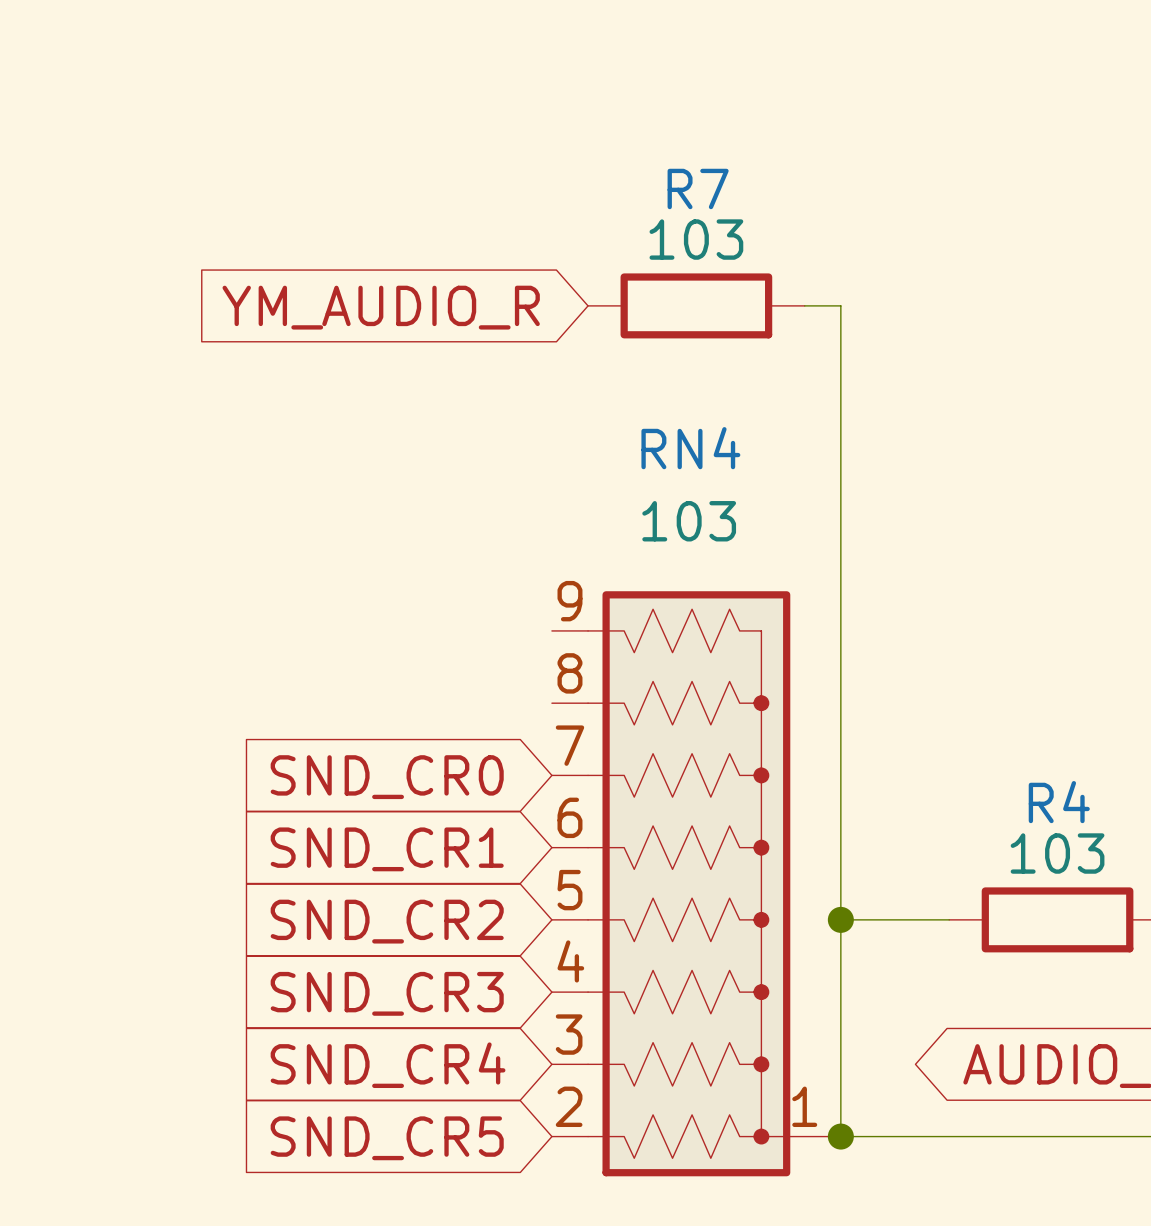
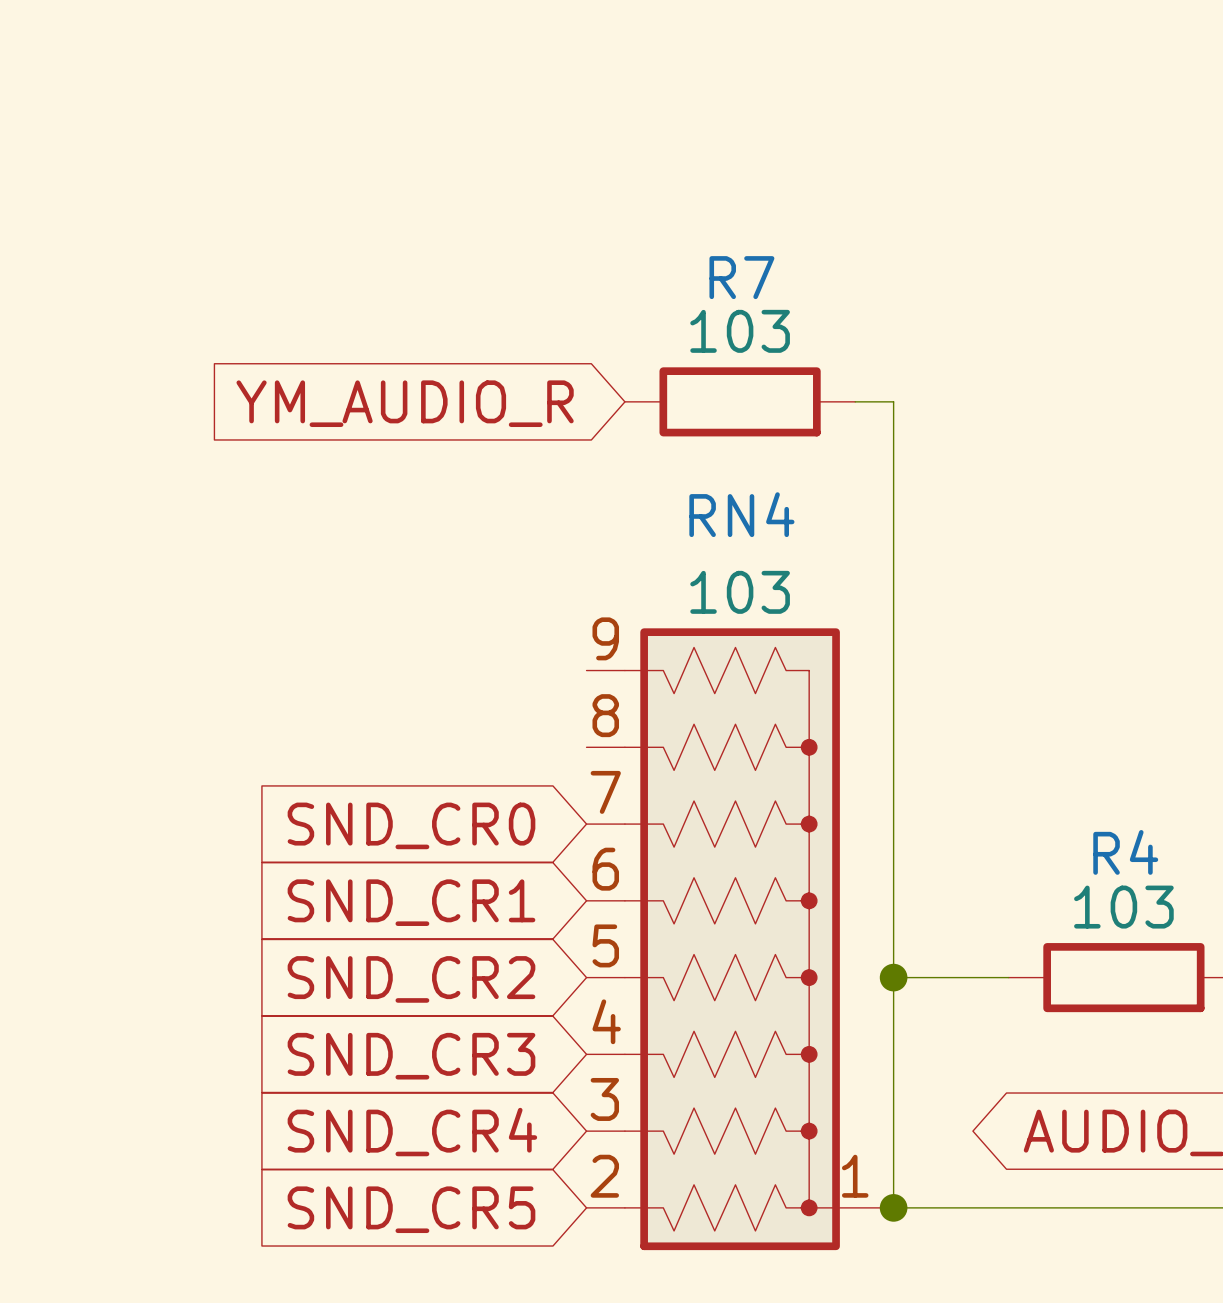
R7 position: (696, 305) -> (740, 401)
wire: (804, 305) (840, 305) (840, 378) -> (855, 401) (893, 401)
global label position: YM_AUDIO_R (381, 307) -> YM_AUDIO_R (405, 403)
RN4 name position: RN4 (690, 448) -> RN4 (741, 514)
RN4 value position: 103 (689, 521) -> 103 (740, 592)

